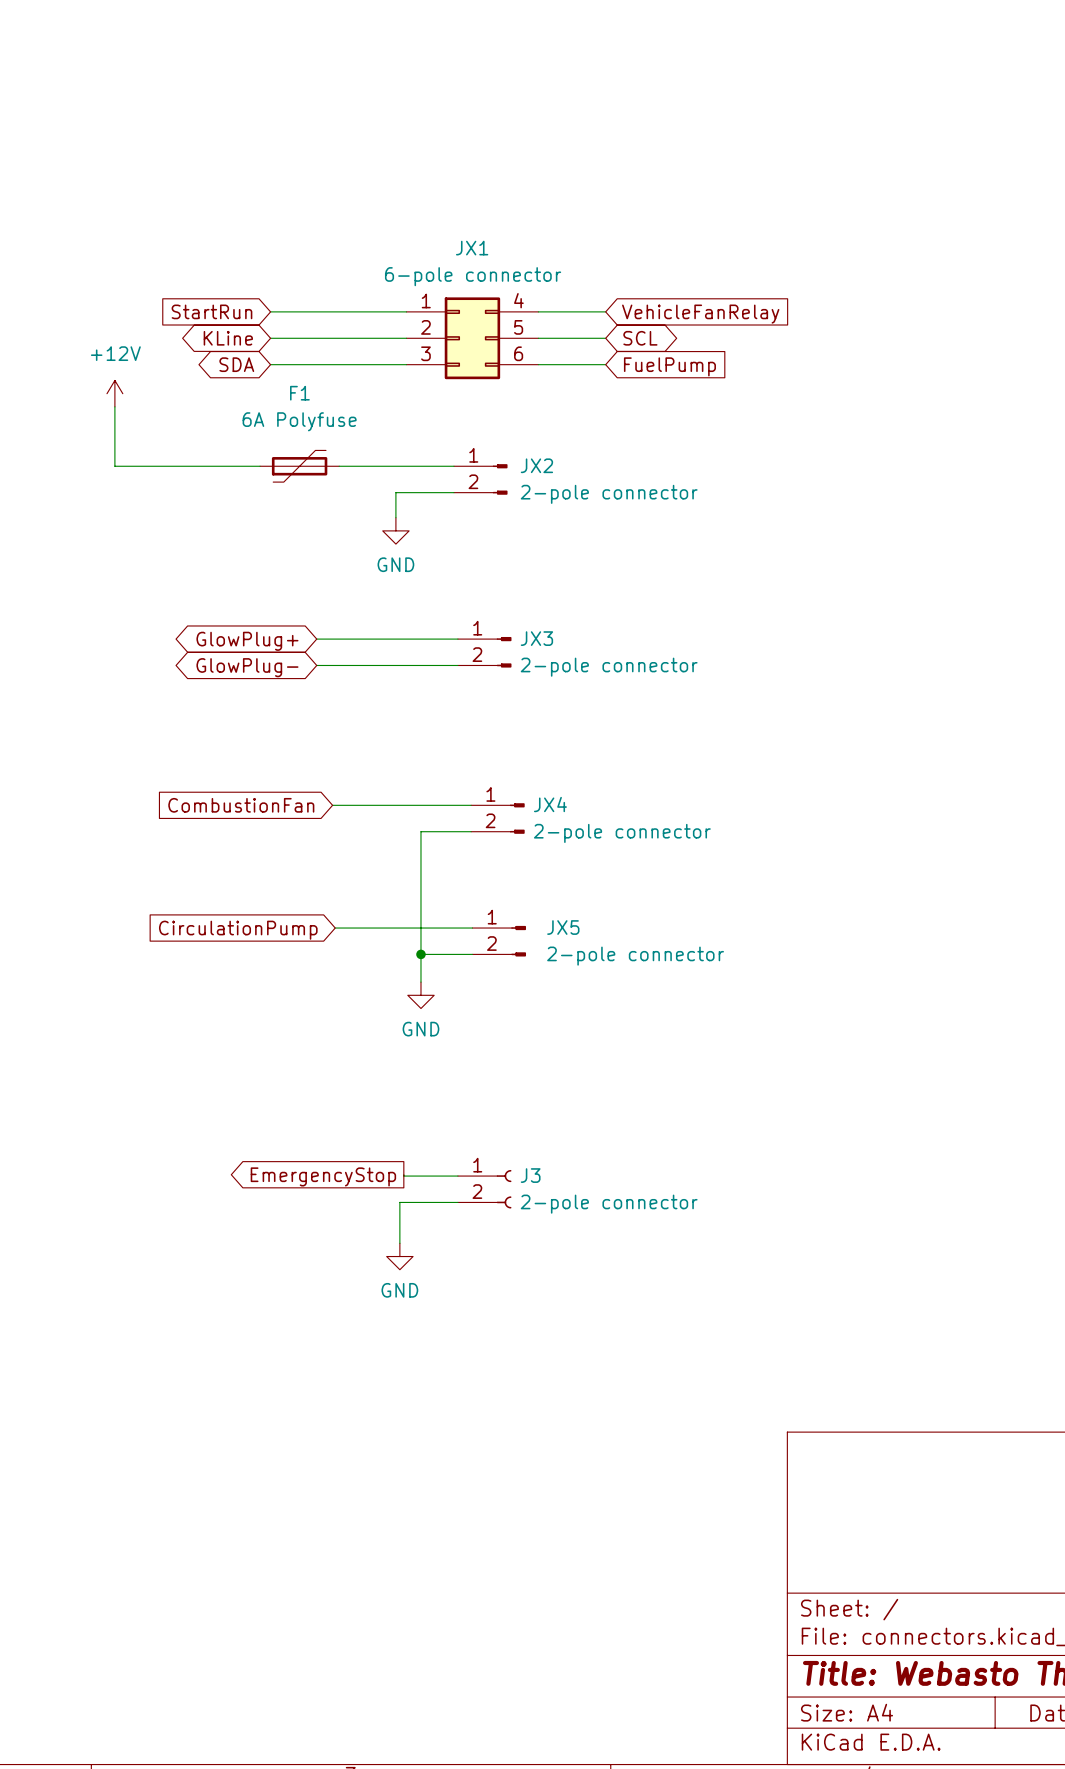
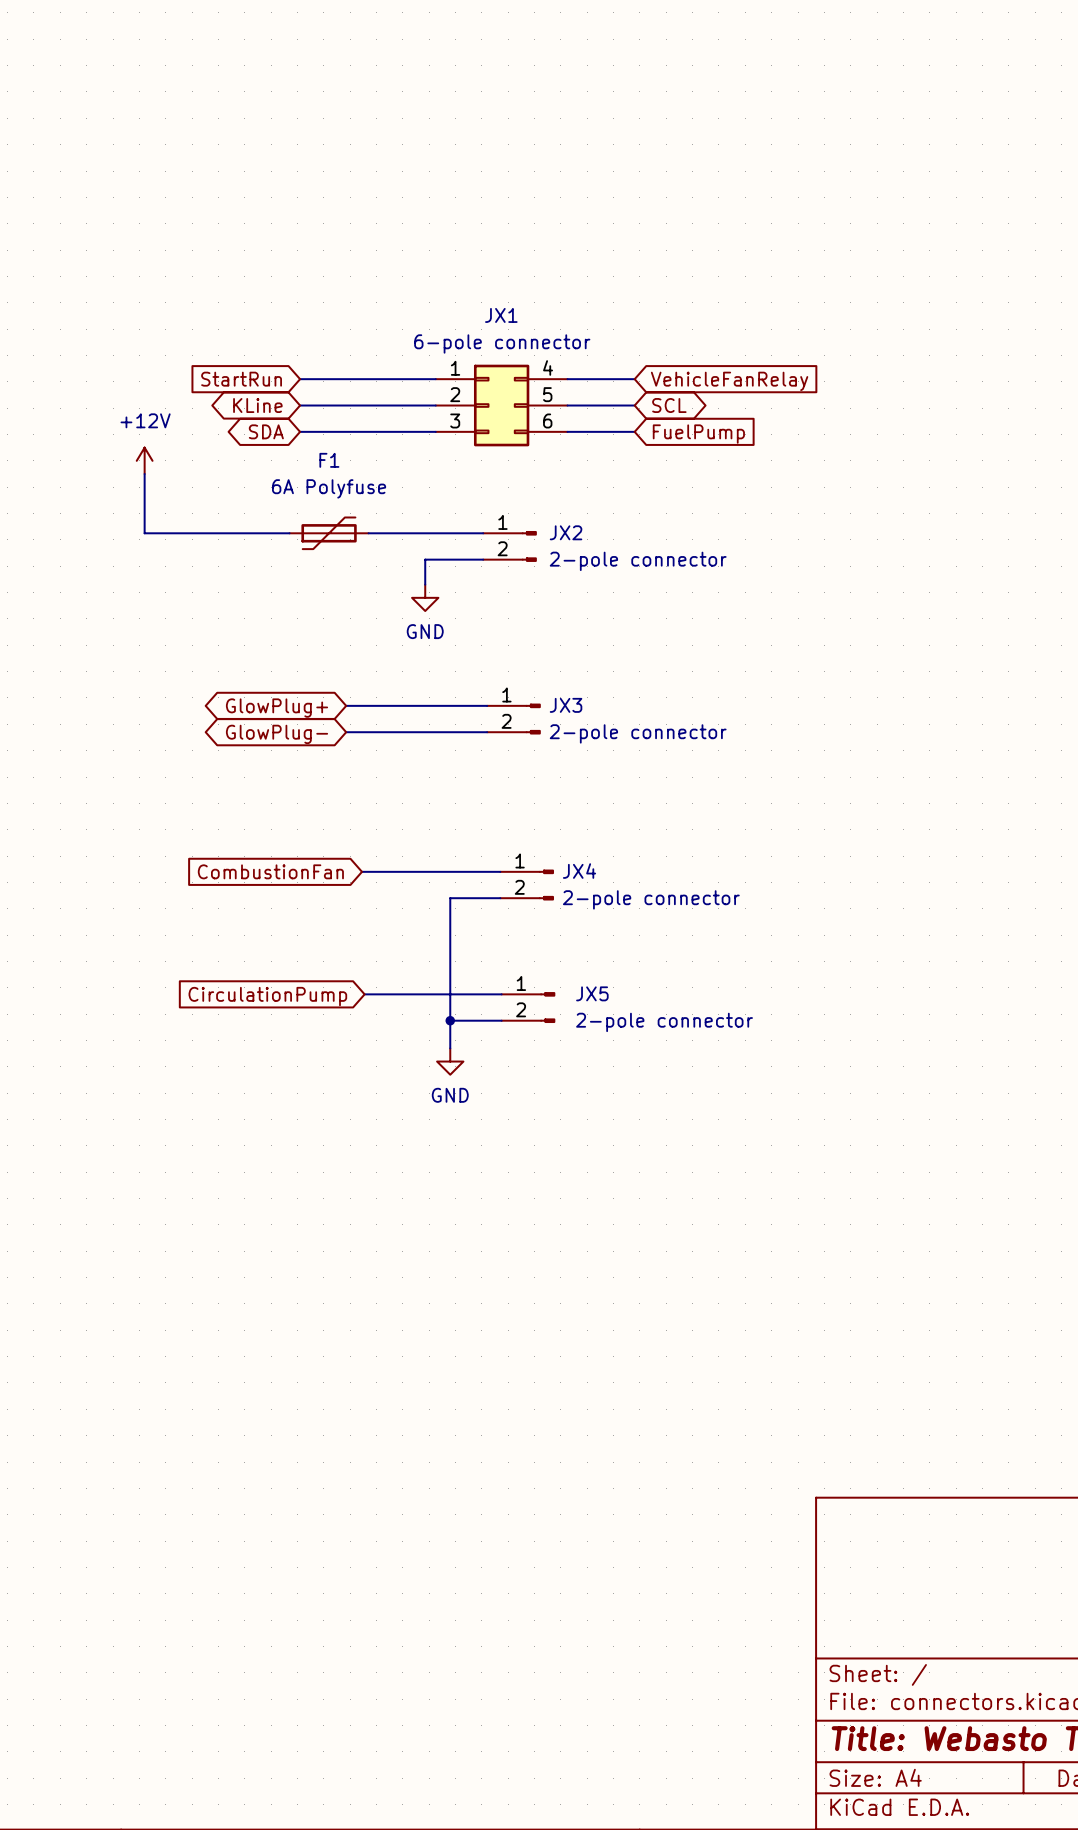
wire: (403, 1174) (457, 1176) -> none
global label: EmergencyStop (323, 1176) -> none
J3: 2-pole connector (484, 1189) -> none
wire: (457, 1202) (399, 1202) (399, 1243) -> none
power symbol: GND (399, 1256) -> none

